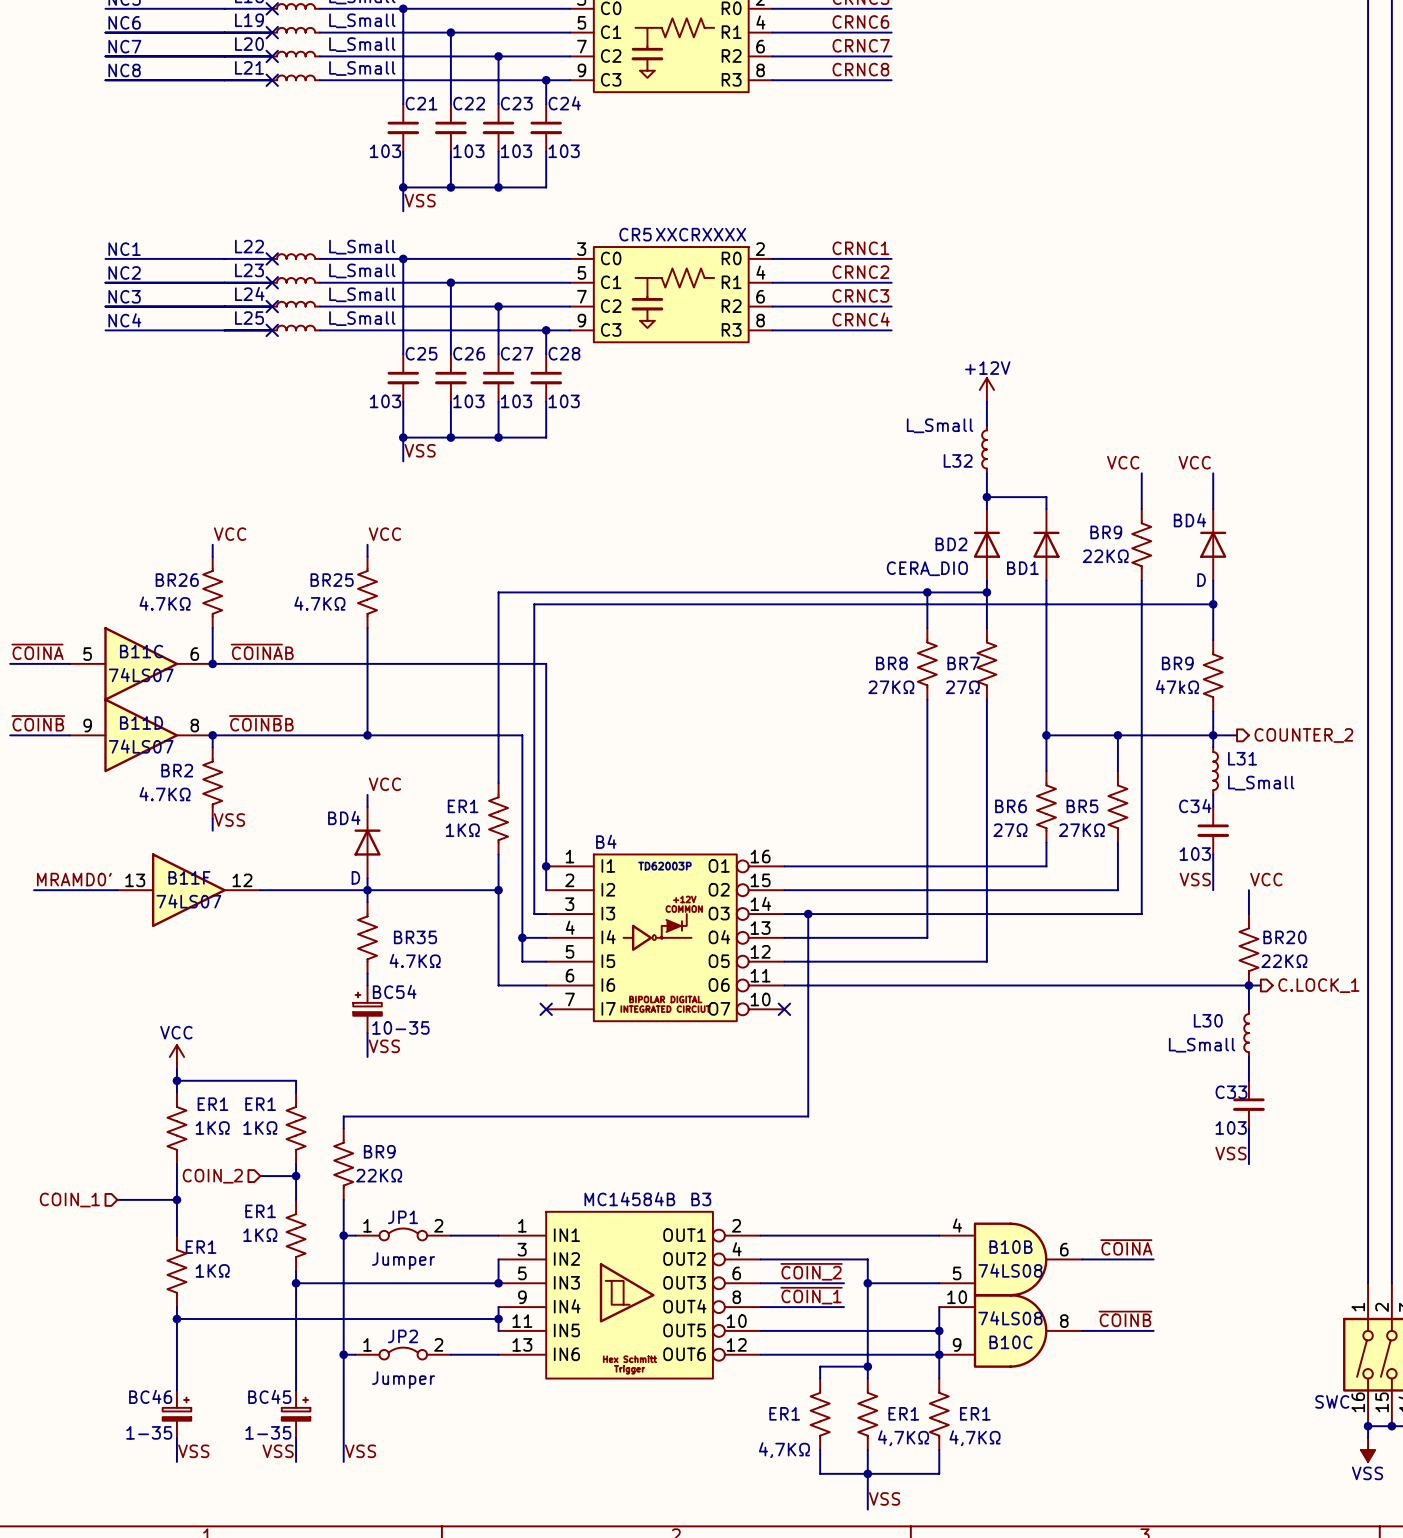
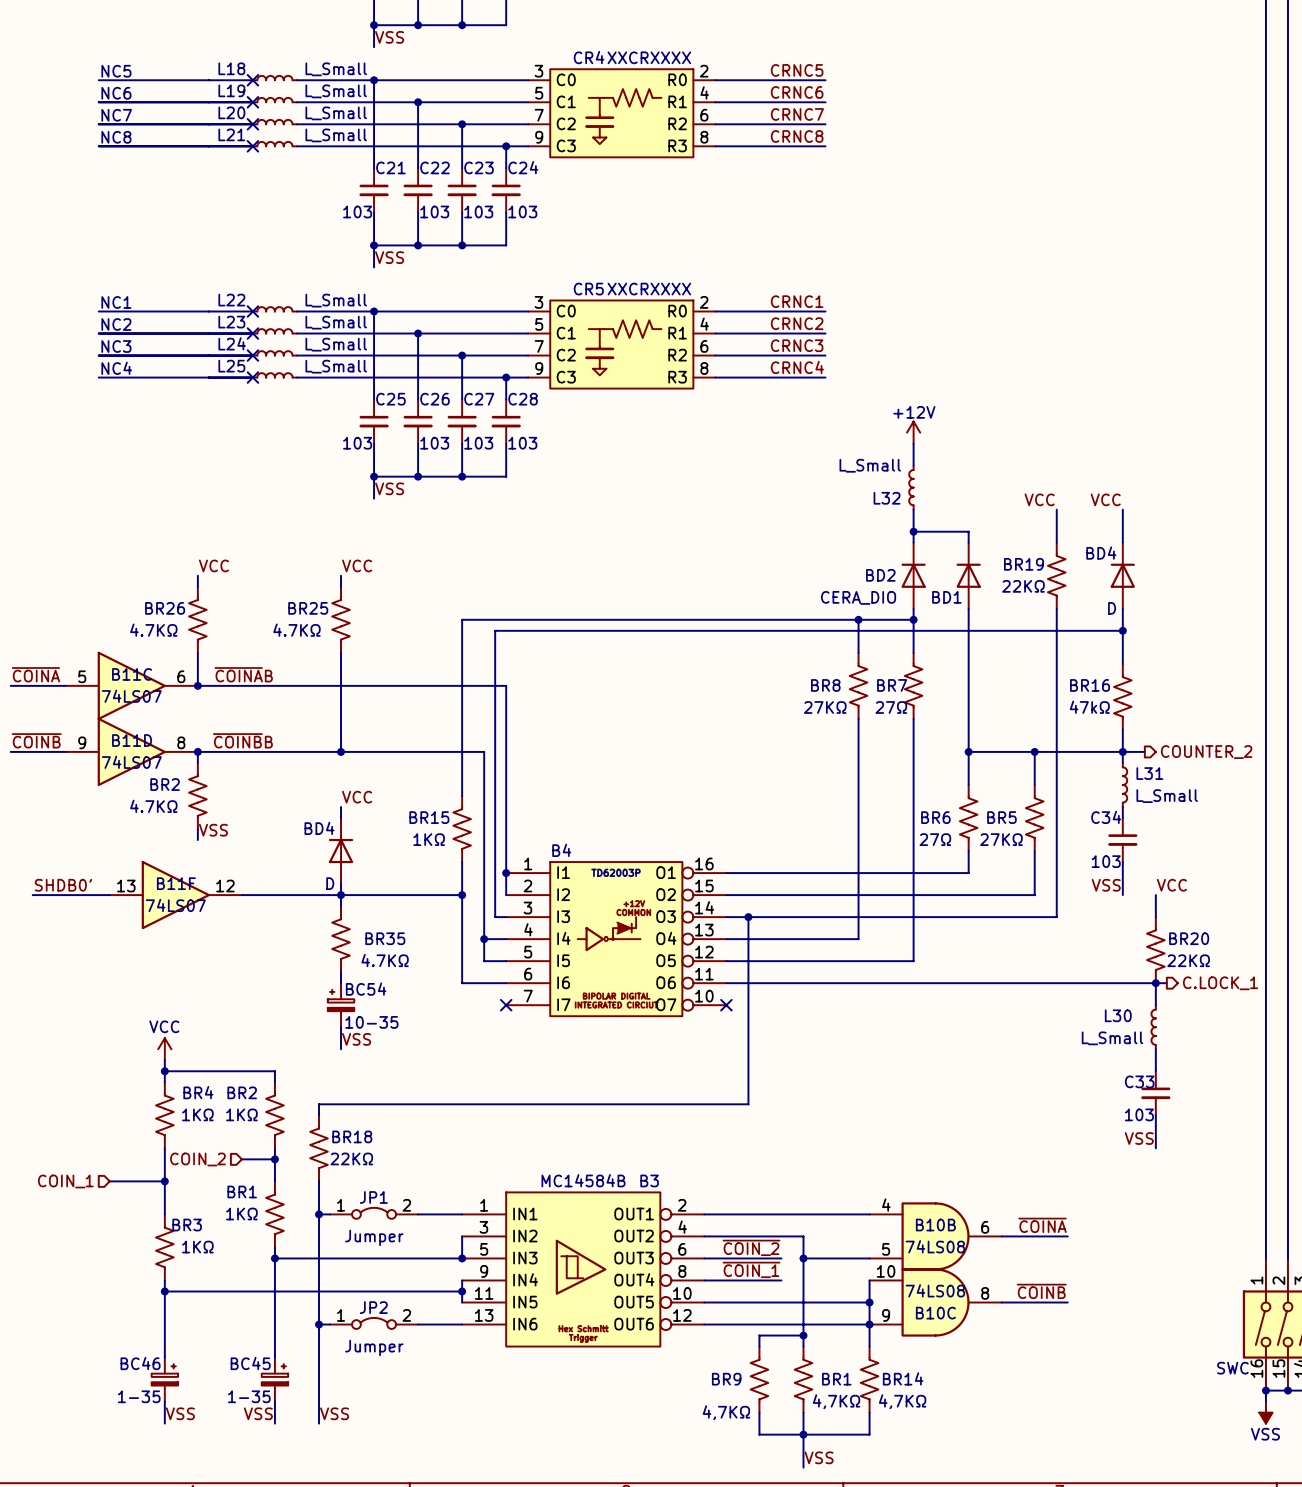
BR9 name: BR9 (1106, 532) -> BR19 (1023, 564)
BR9 name: BR9 (1177, 663) -> BR16 (1090, 685)
ER1 name: ER1 (463, 806) -> BR15 (429, 817)
label: MRAMD0' (74, 879) -> SHDB0' (63, 885)
ER1 name: ER1 (212, 1104) -> BR4 (198, 1092)
ER1 name: ER1 (260, 1104) -> BR2 (242, 1092)
BR9 name: BR9 (379, 1151) -> BR18 (352, 1136)
ER1 name: ER1 (260, 1211) -> BR1 (242, 1191)
ER1 name: ER1 (201, 1247) -> BR3 (187, 1225)
ER1 name: ER1 (784, 1413) -> BR9 (726, 1379)
ER1 name: ER1 (903, 1413) -> BR1 (836, 1379)
ER1 name: ER1 (975, 1413) -> BR14 (903, 1378)

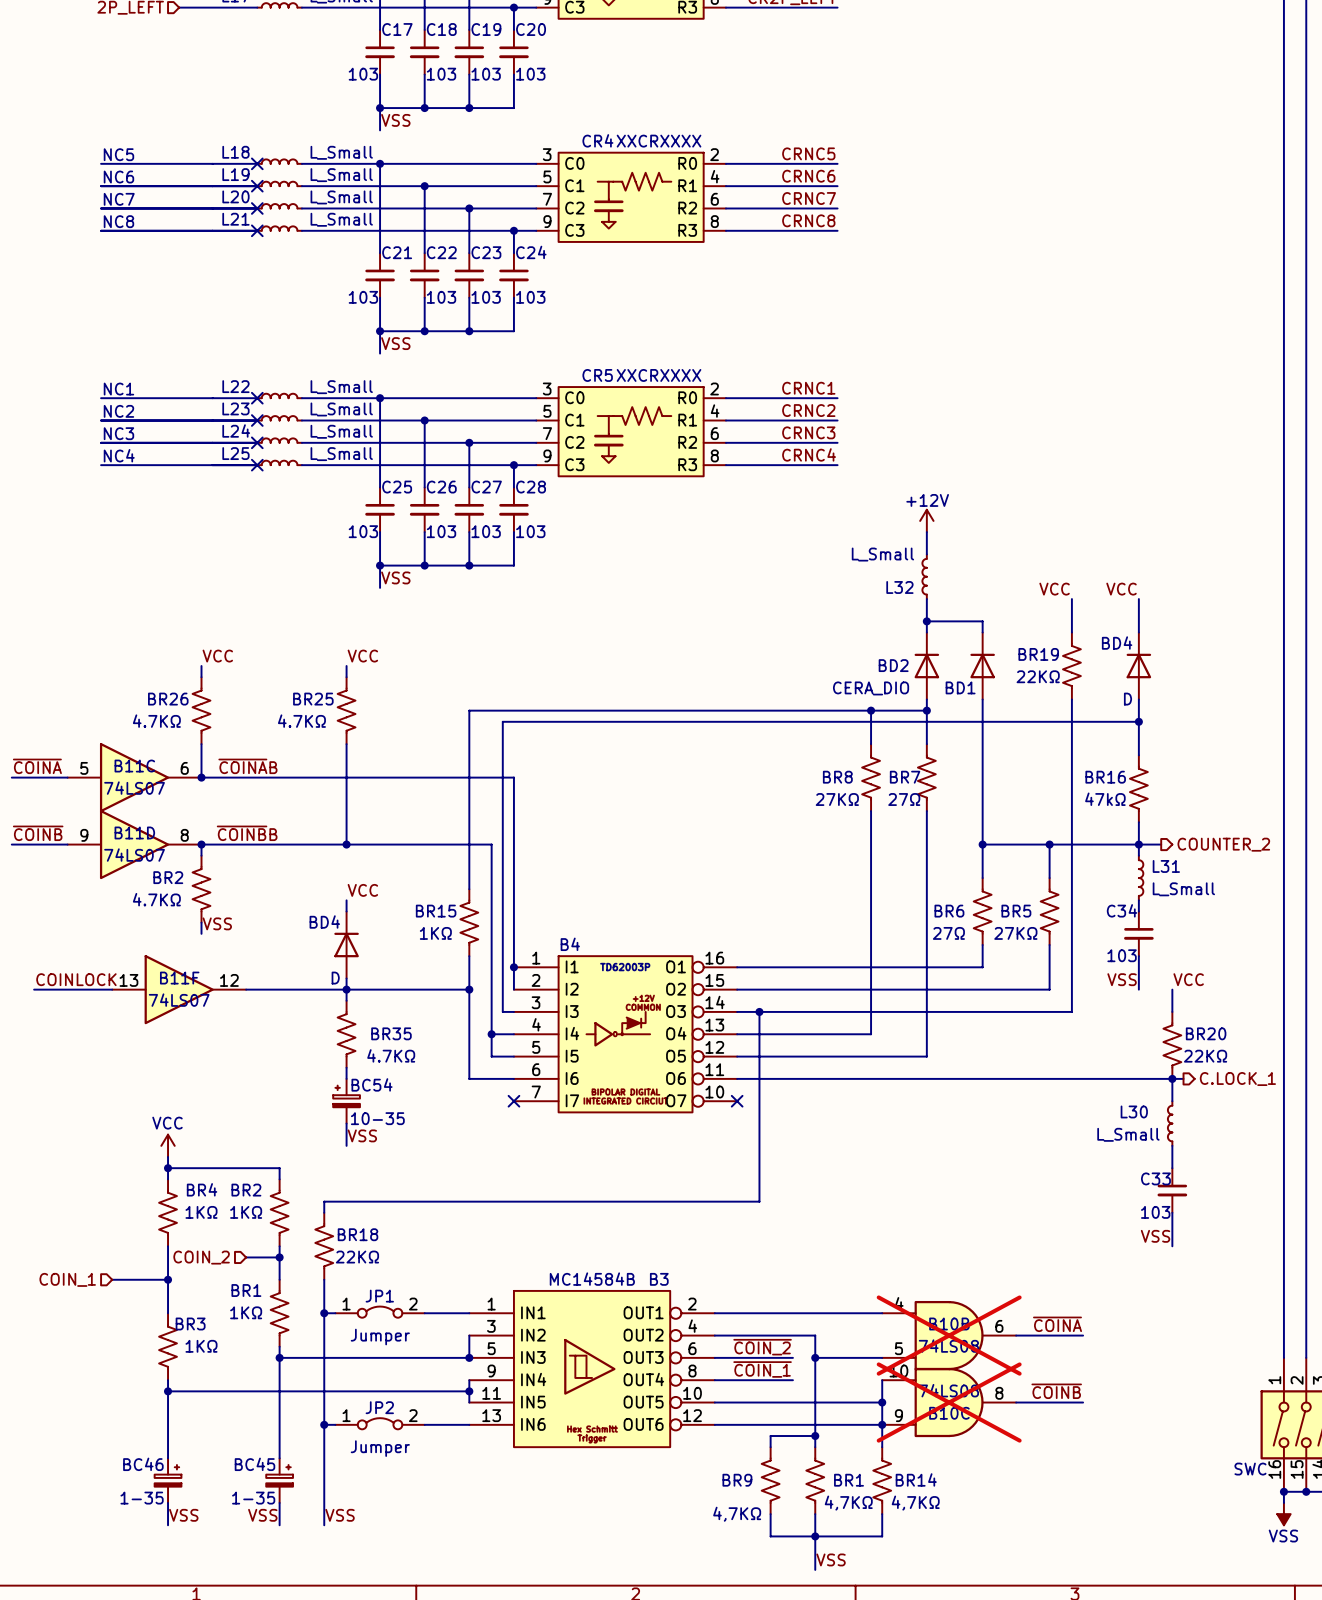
label: SHDB0' (63, 885) -> COINLOCK (76, 979)
B10B do-not-place cross: none -> (949, 1335)
B10C do-not-place cross: none -> (949, 1402)

